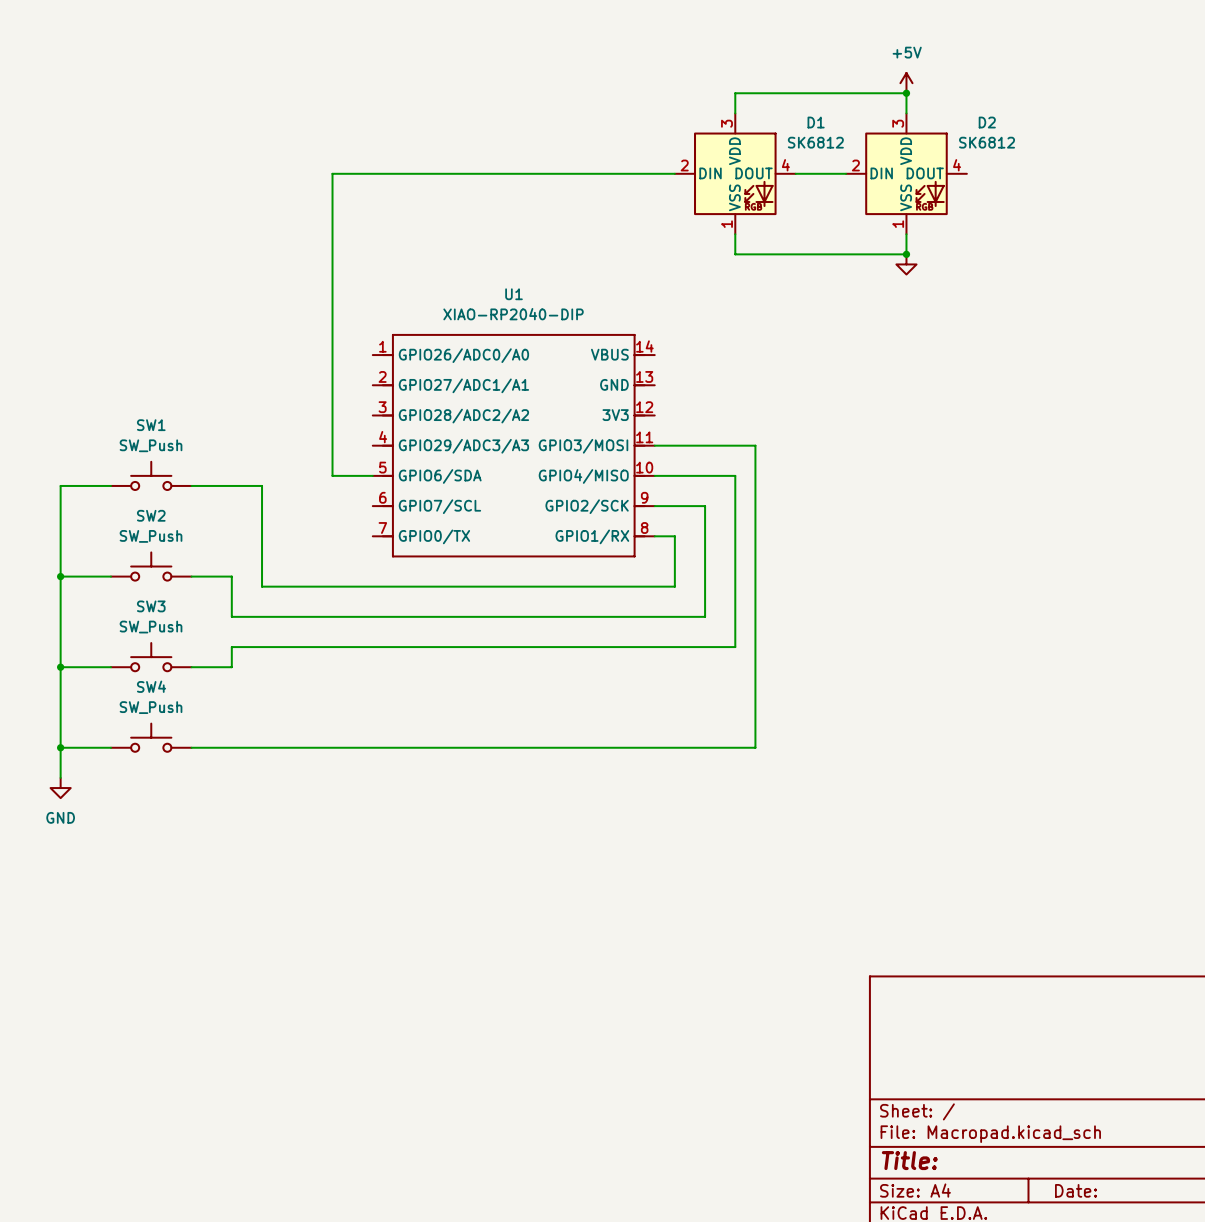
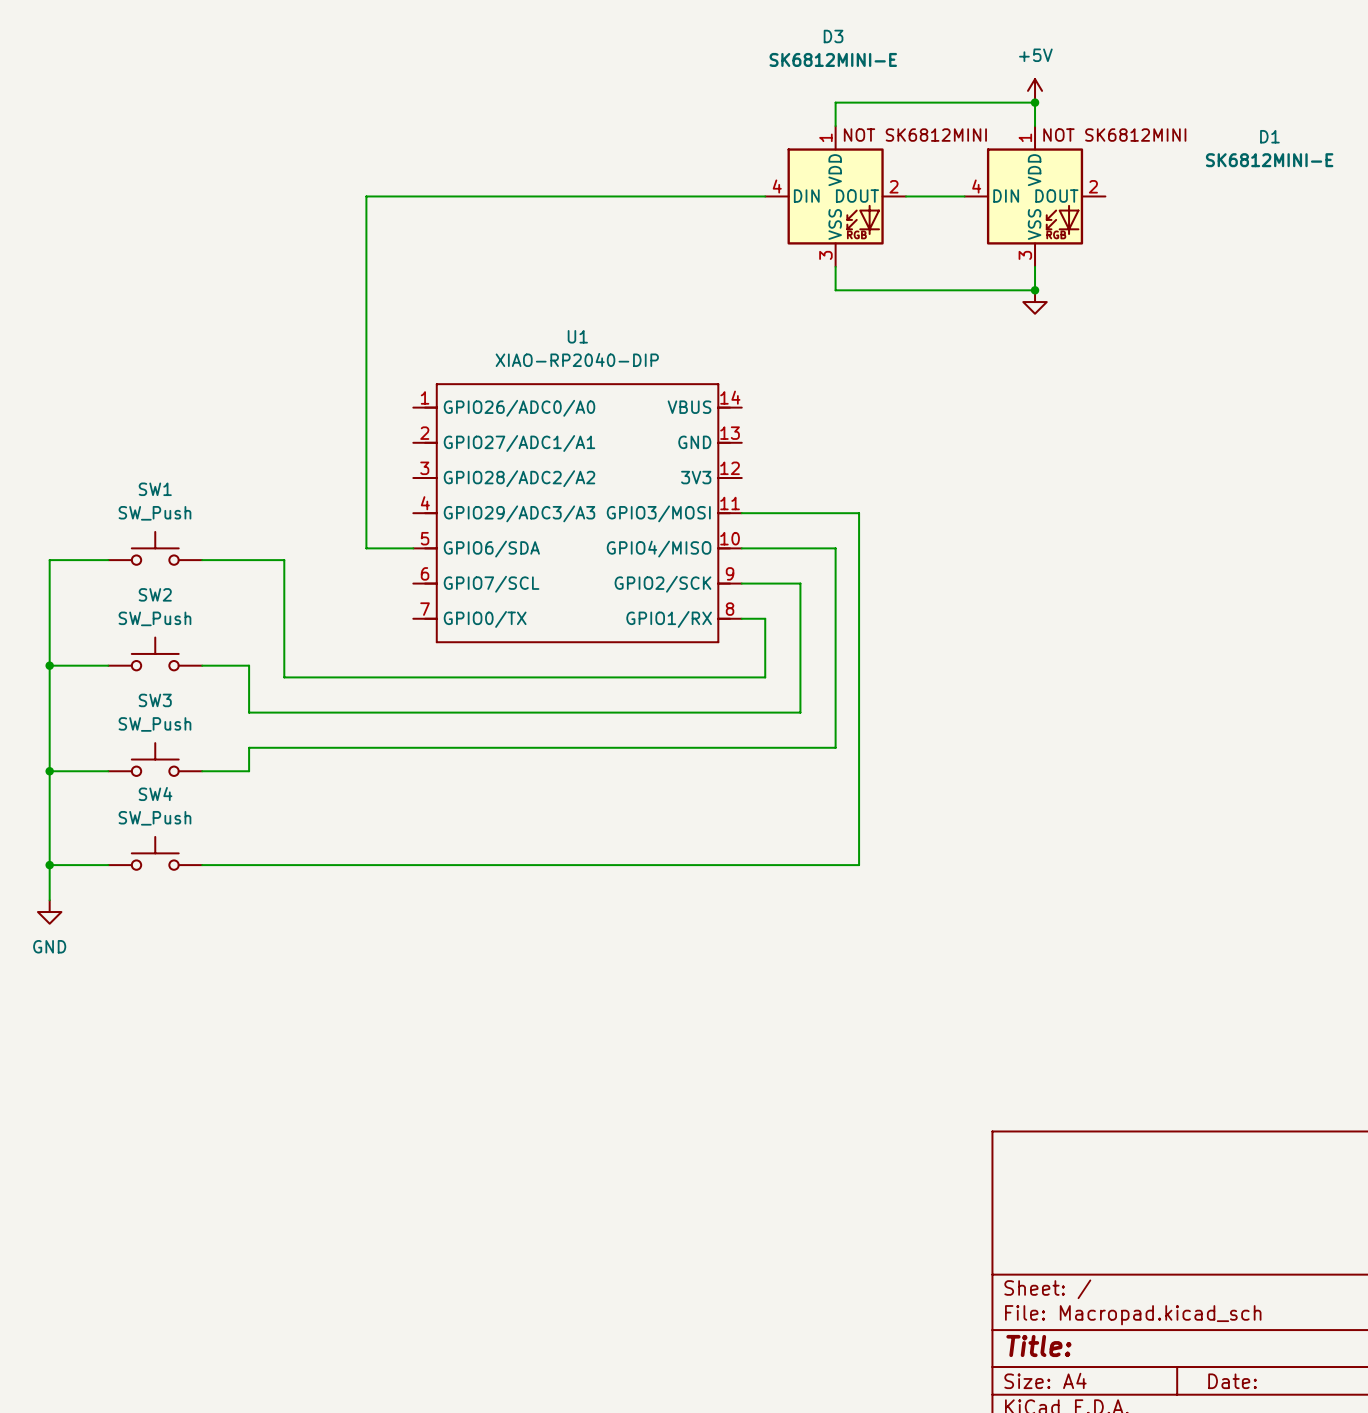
D1 text: none -> NOT SK6812MINI (1114, 135)
D1 name position: D1 (816, 122) -> D1 (1269, 136)
D1 pin number: 3 (726, 123) -> 1 (1025, 137)
D1 value: SK6812 (815, 142) -> SK6812MINI-E (1269, 160)
D1 pin number: 2 (684, 165) -> 4 (976, 186)
D1 pin number: 4 (785, 165) -> 2 (1093, 186)
D1 position: (735, 173) -> (1035, 196)
D3: none -> SK6812MINI-E (835, 196)
D2: SK6812 (906, 173) -> none
D1 pin number: 1 (726, 224) -> 3 (1025, 255)

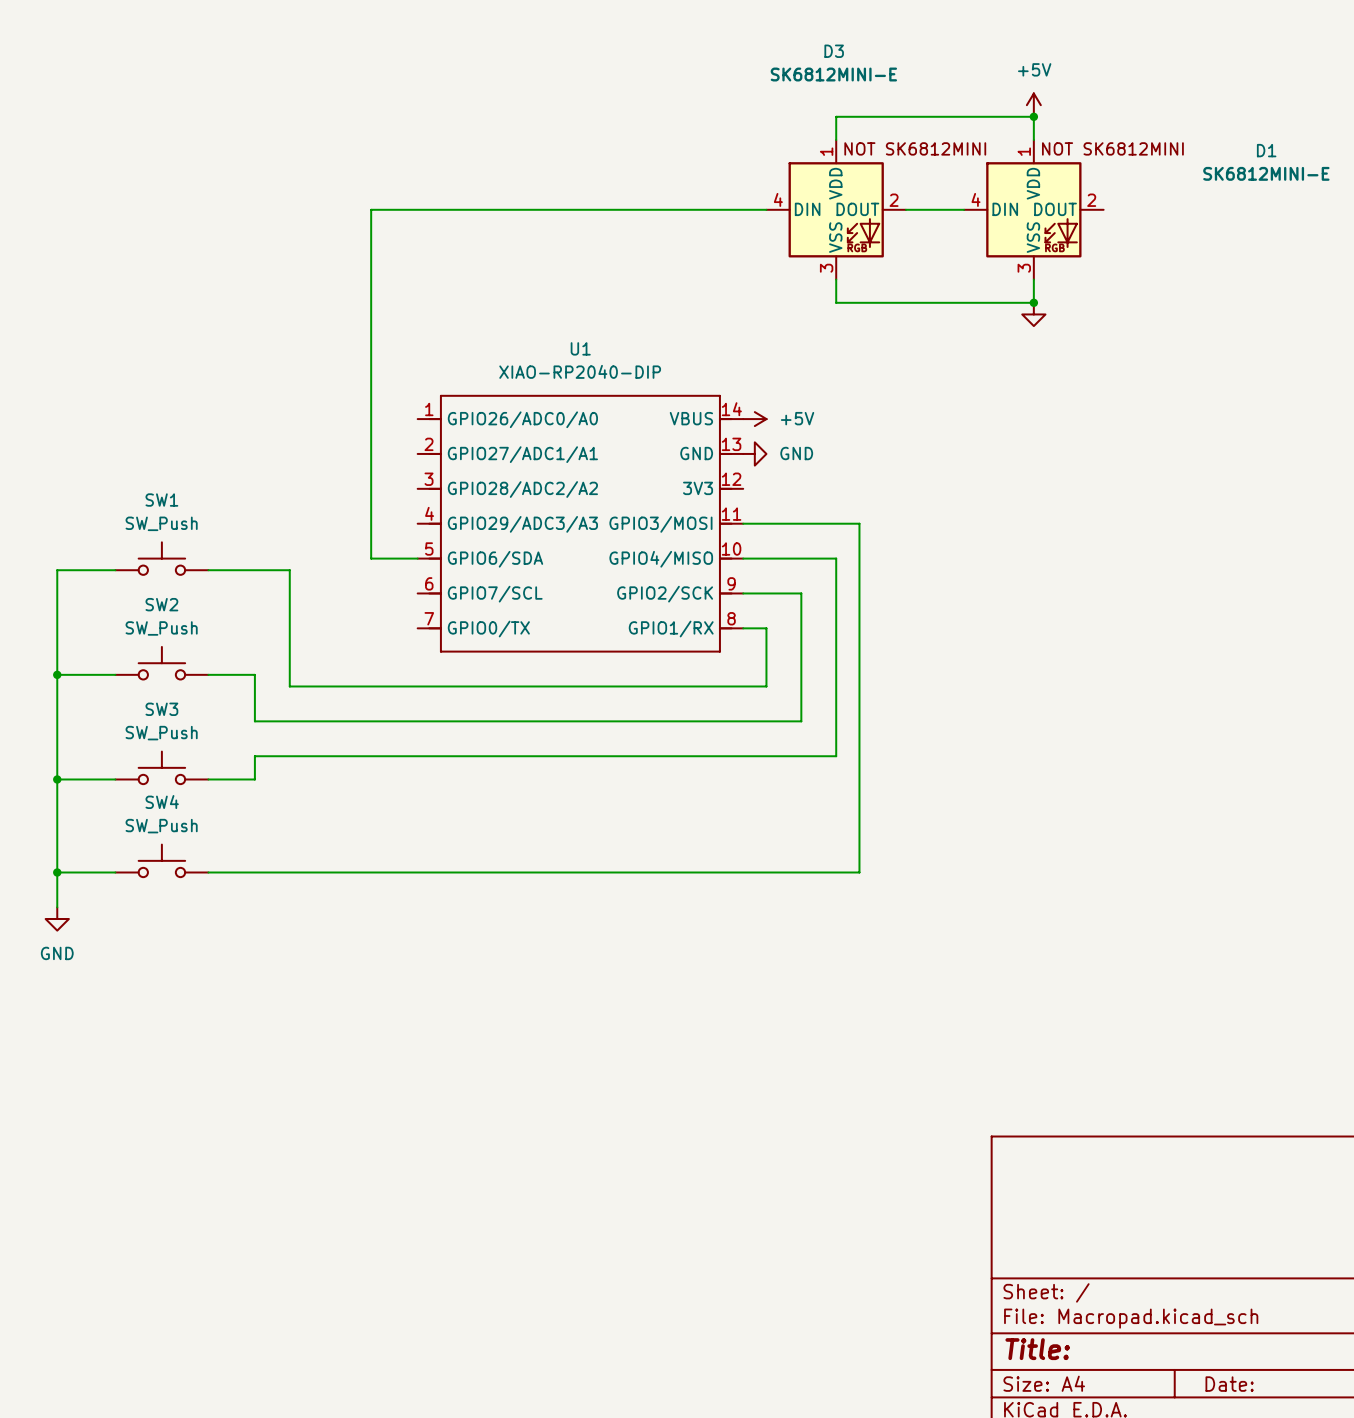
power symbol: none -> +5V (754, 419)
power symbol: none -> GND (754, 453)

